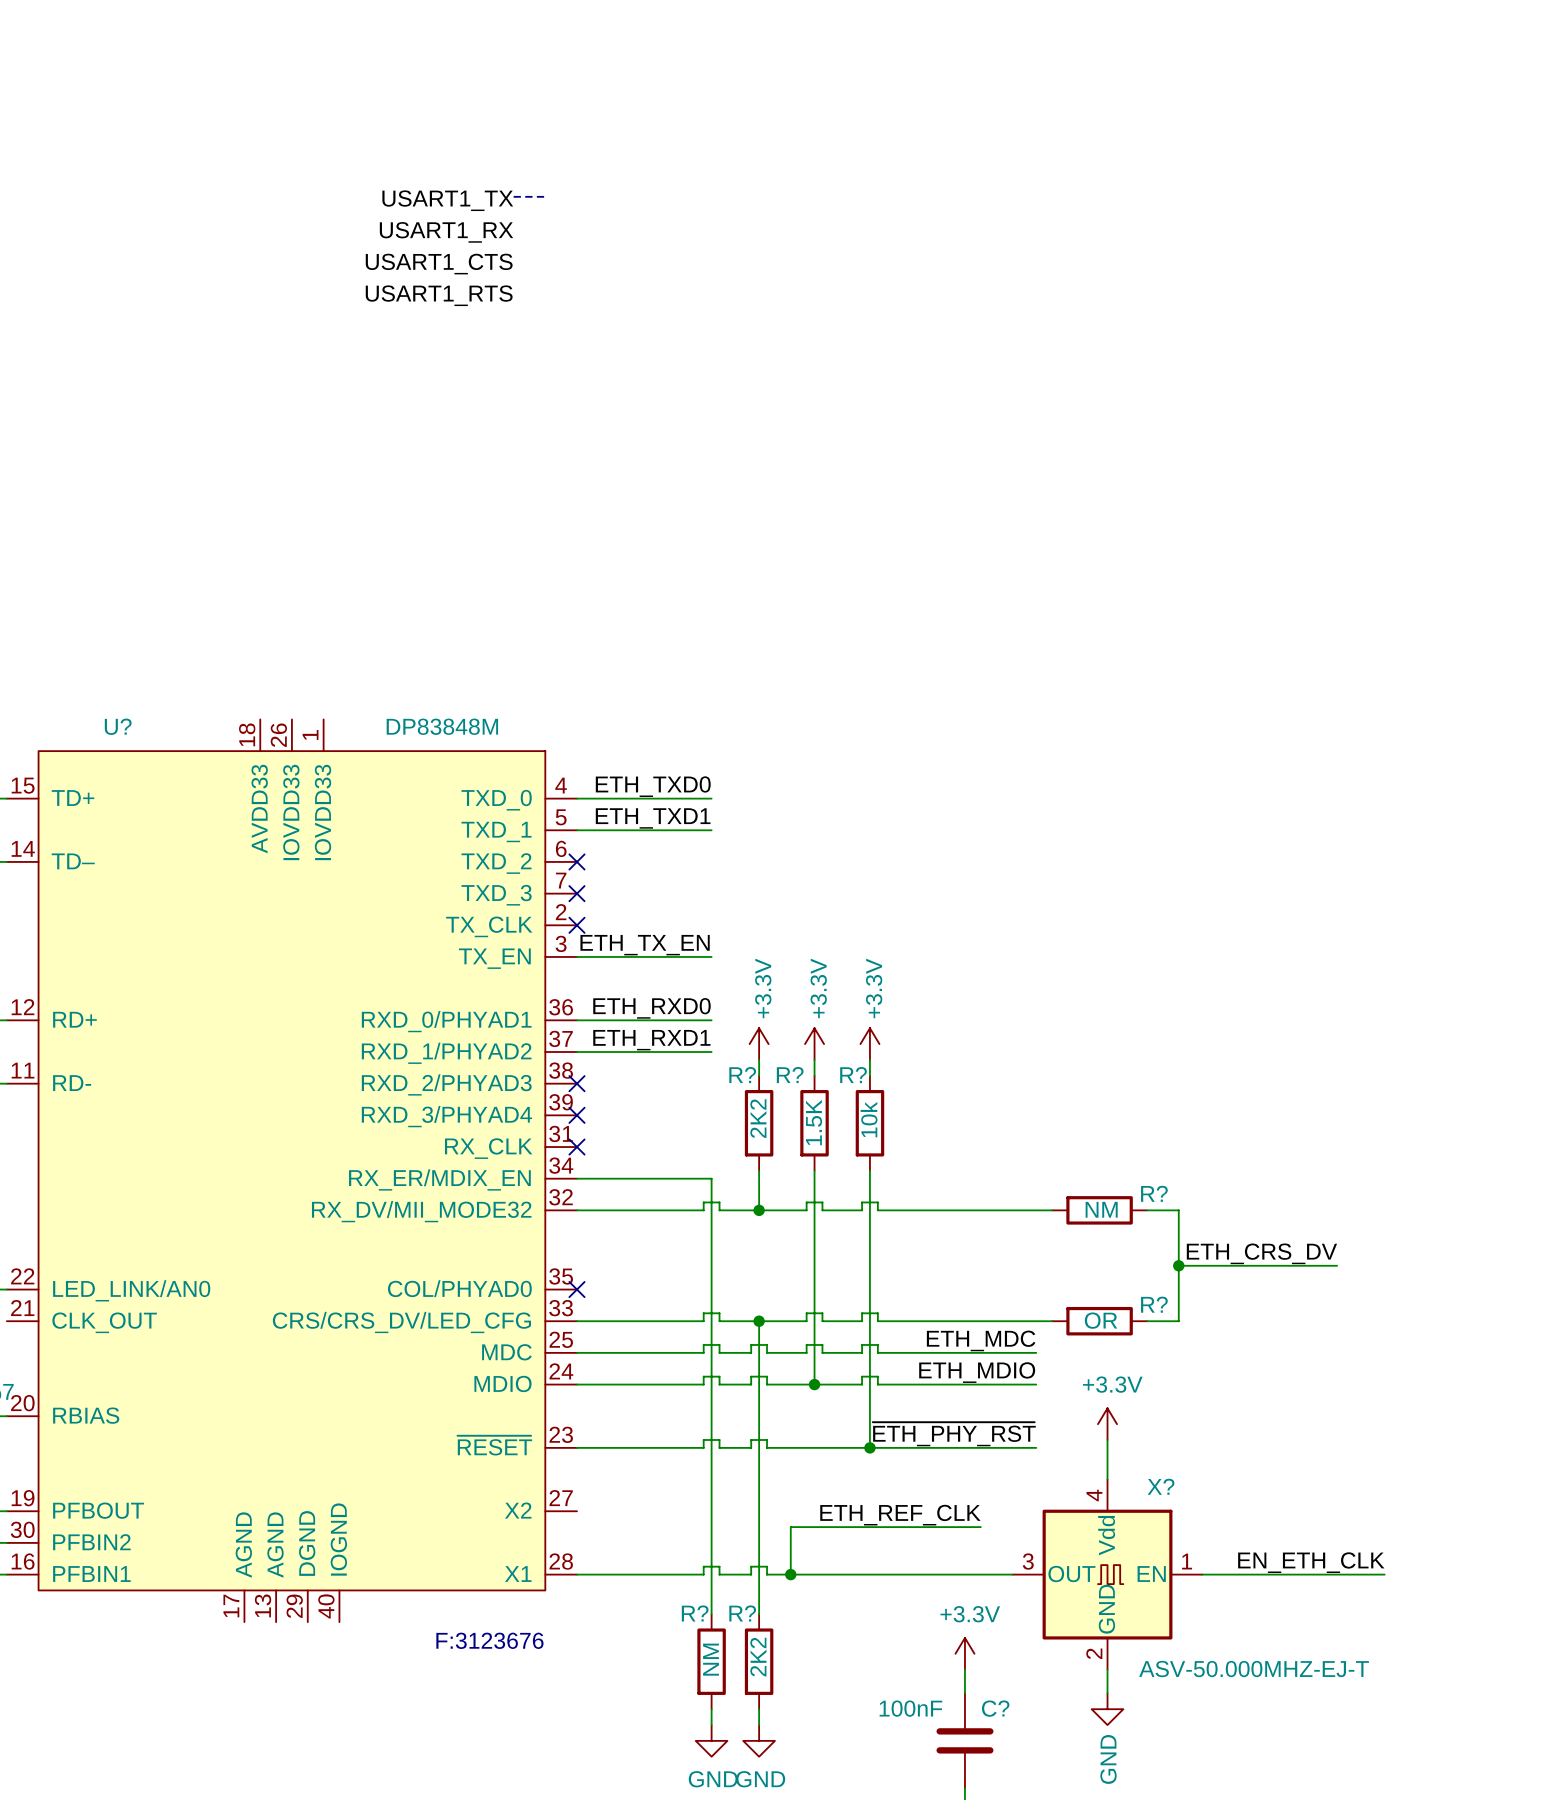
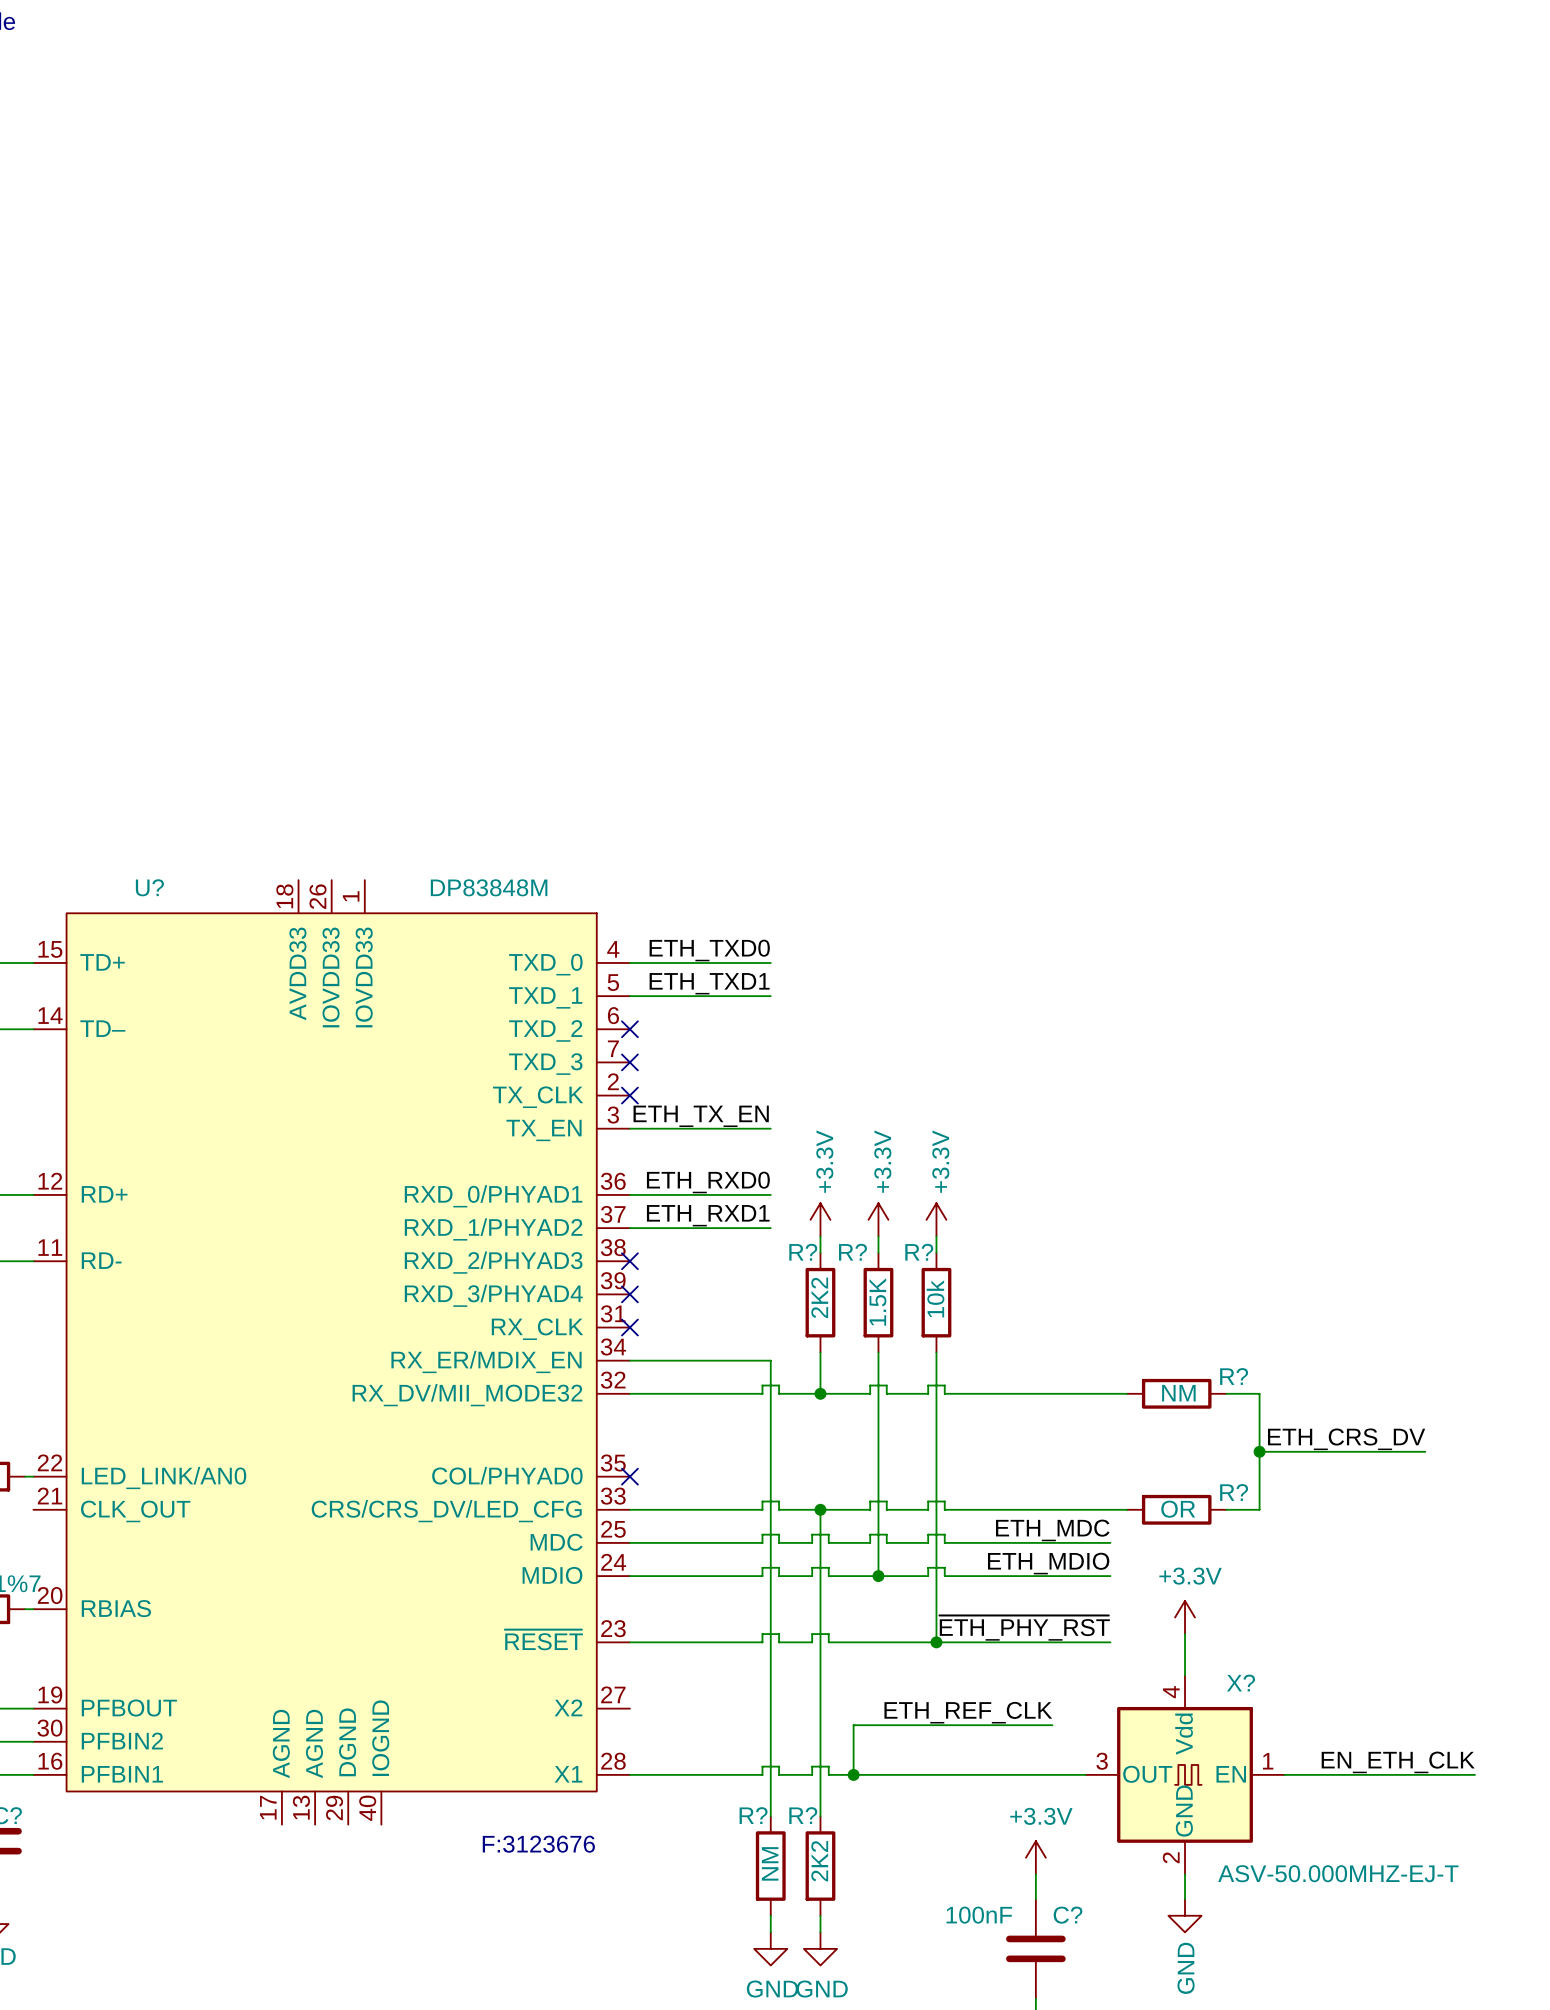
line: (513, 196) (545, 196) -> none
label: USART1_TX (447, 200) -> none
label: USART1_RX (446, 232) -> none
label: USART1_CTS (439, 264) -> none
label: USART1_RTS (439, 295) -> none

